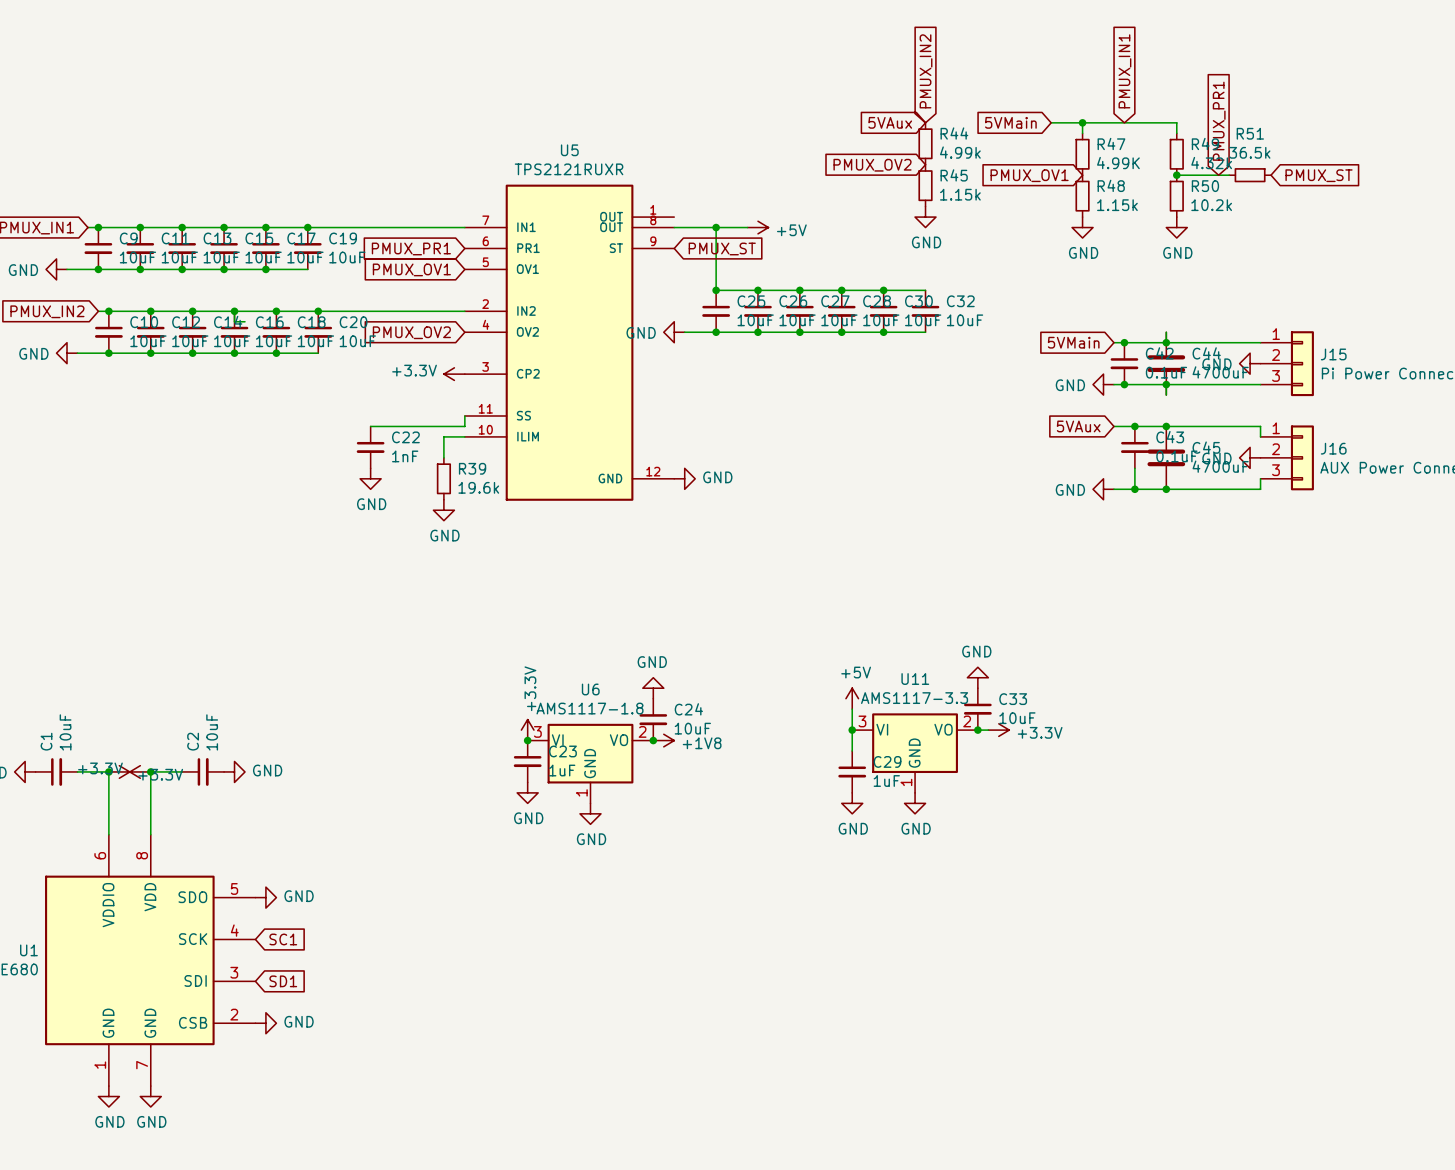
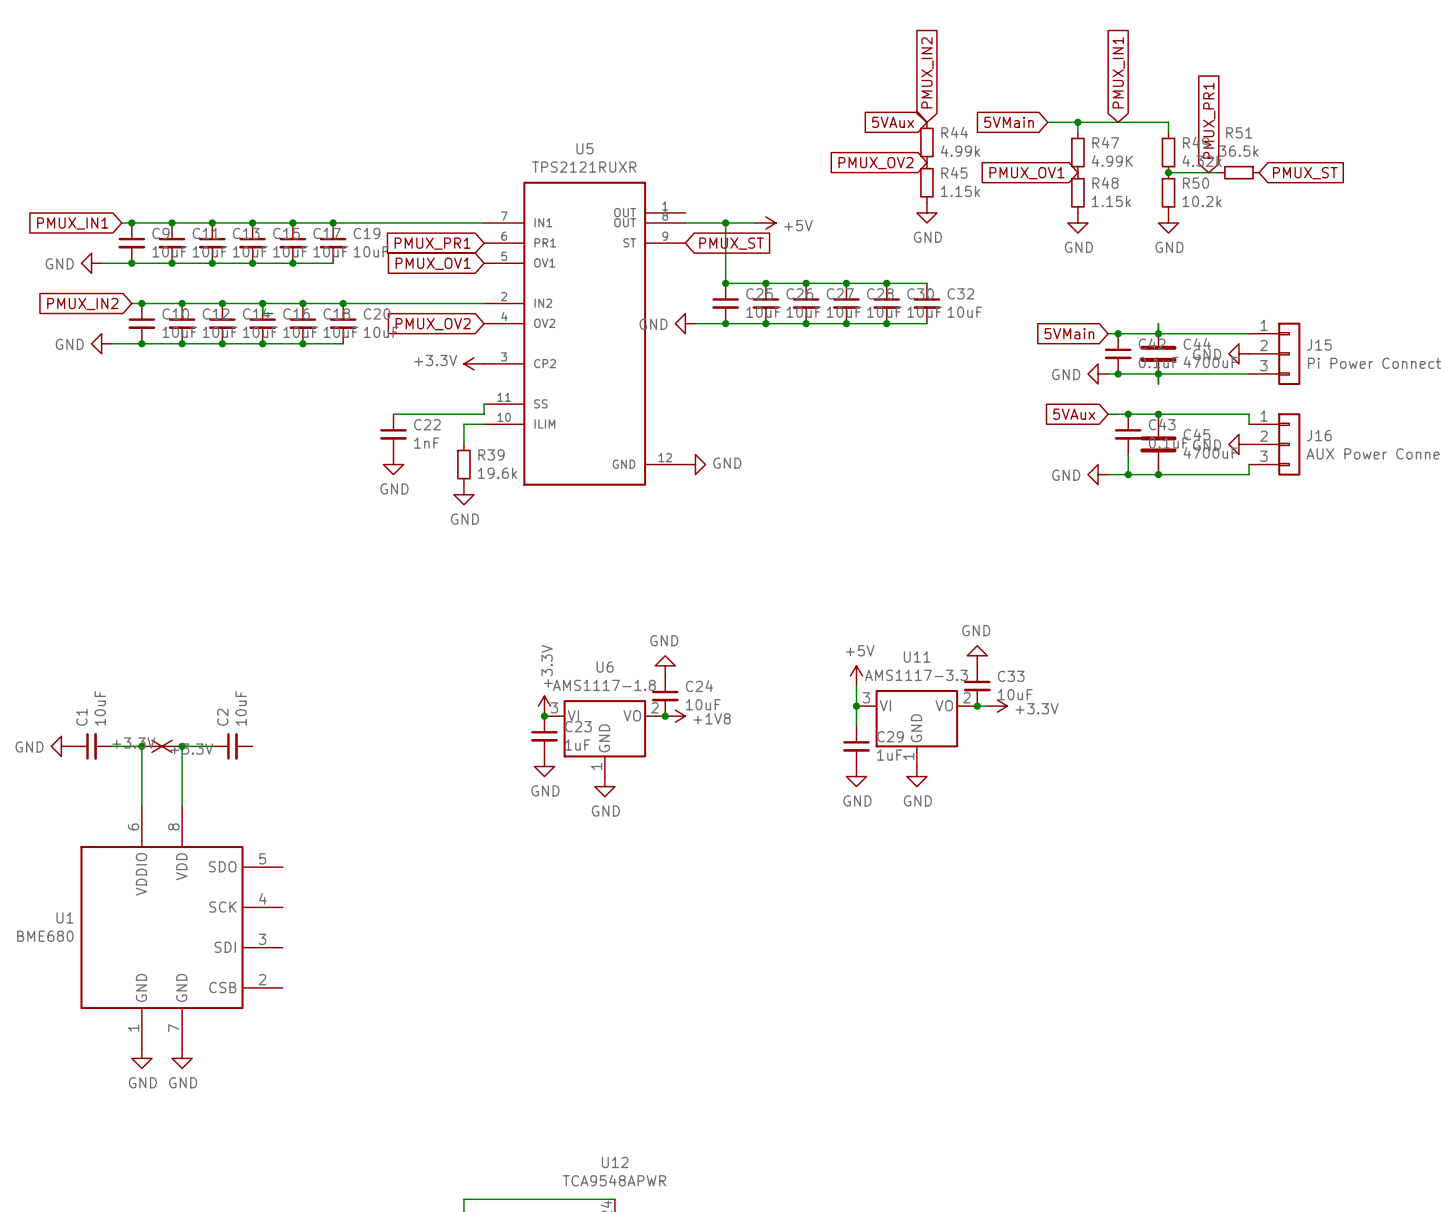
power symbol: GND (234, 771) -> none
power symbol: GND (265, 897) -> none
global label: SC1 (283, 939) -> none
global label: SD1 (283, 981) -> none
power symbol: GND (265, 1023) -> none

